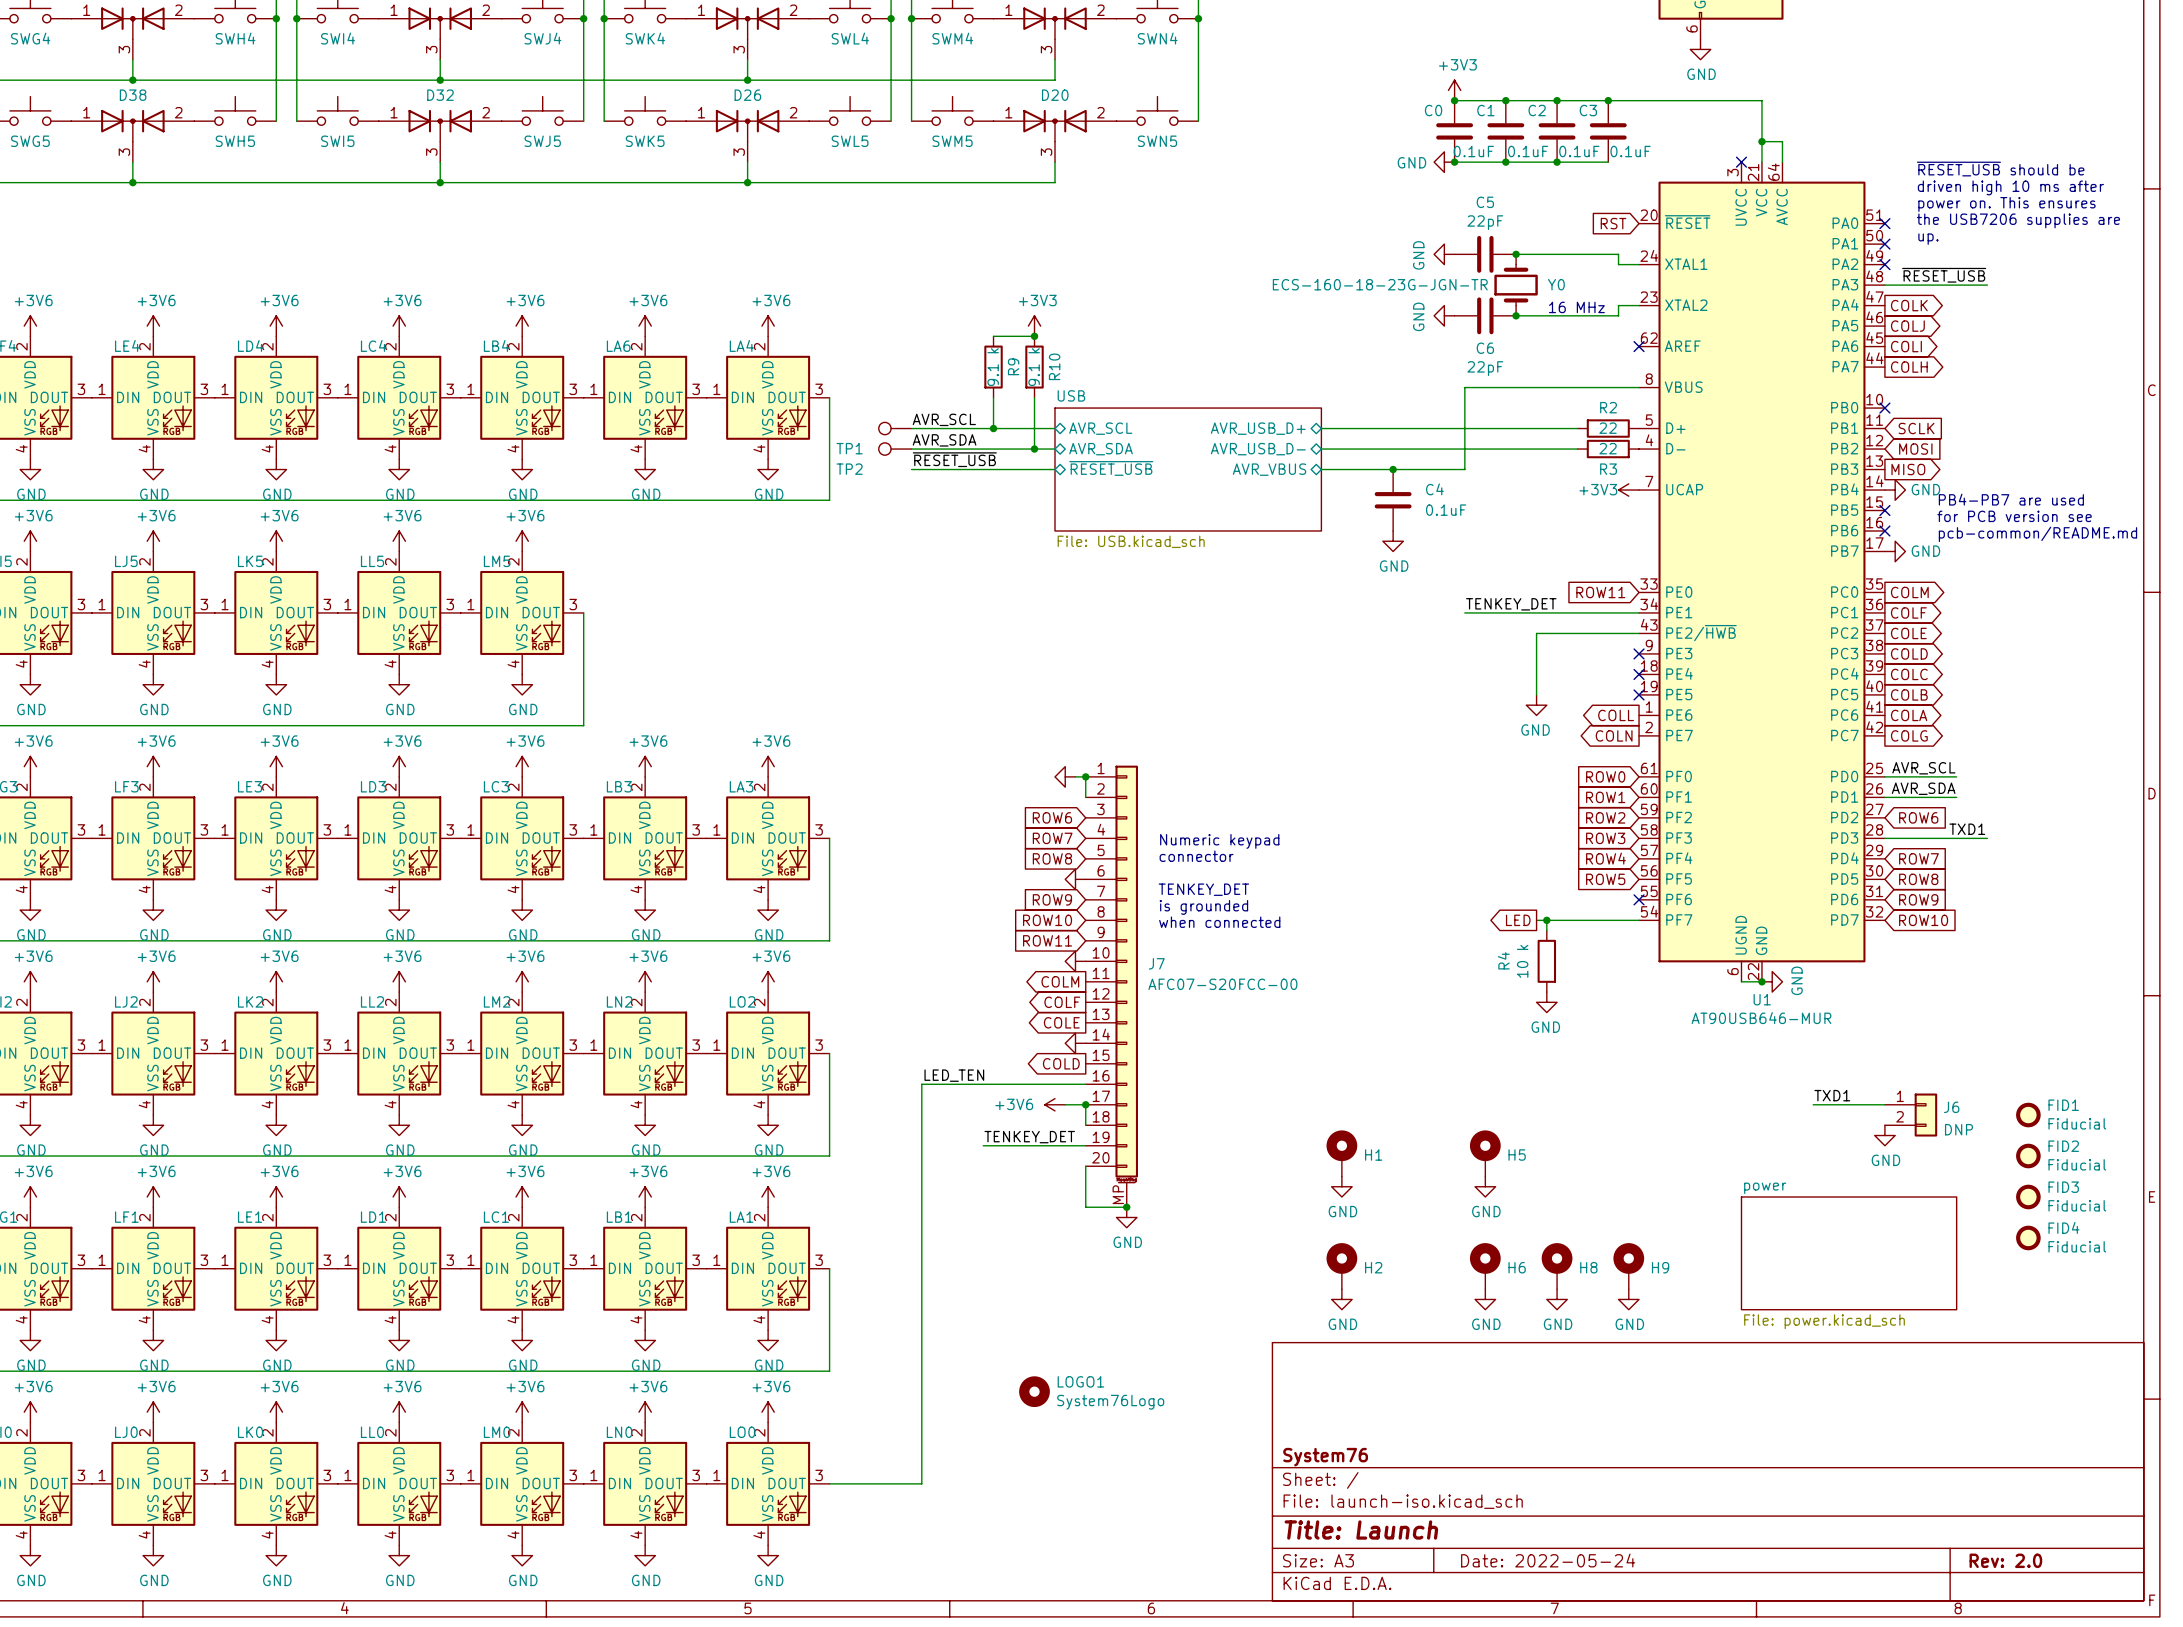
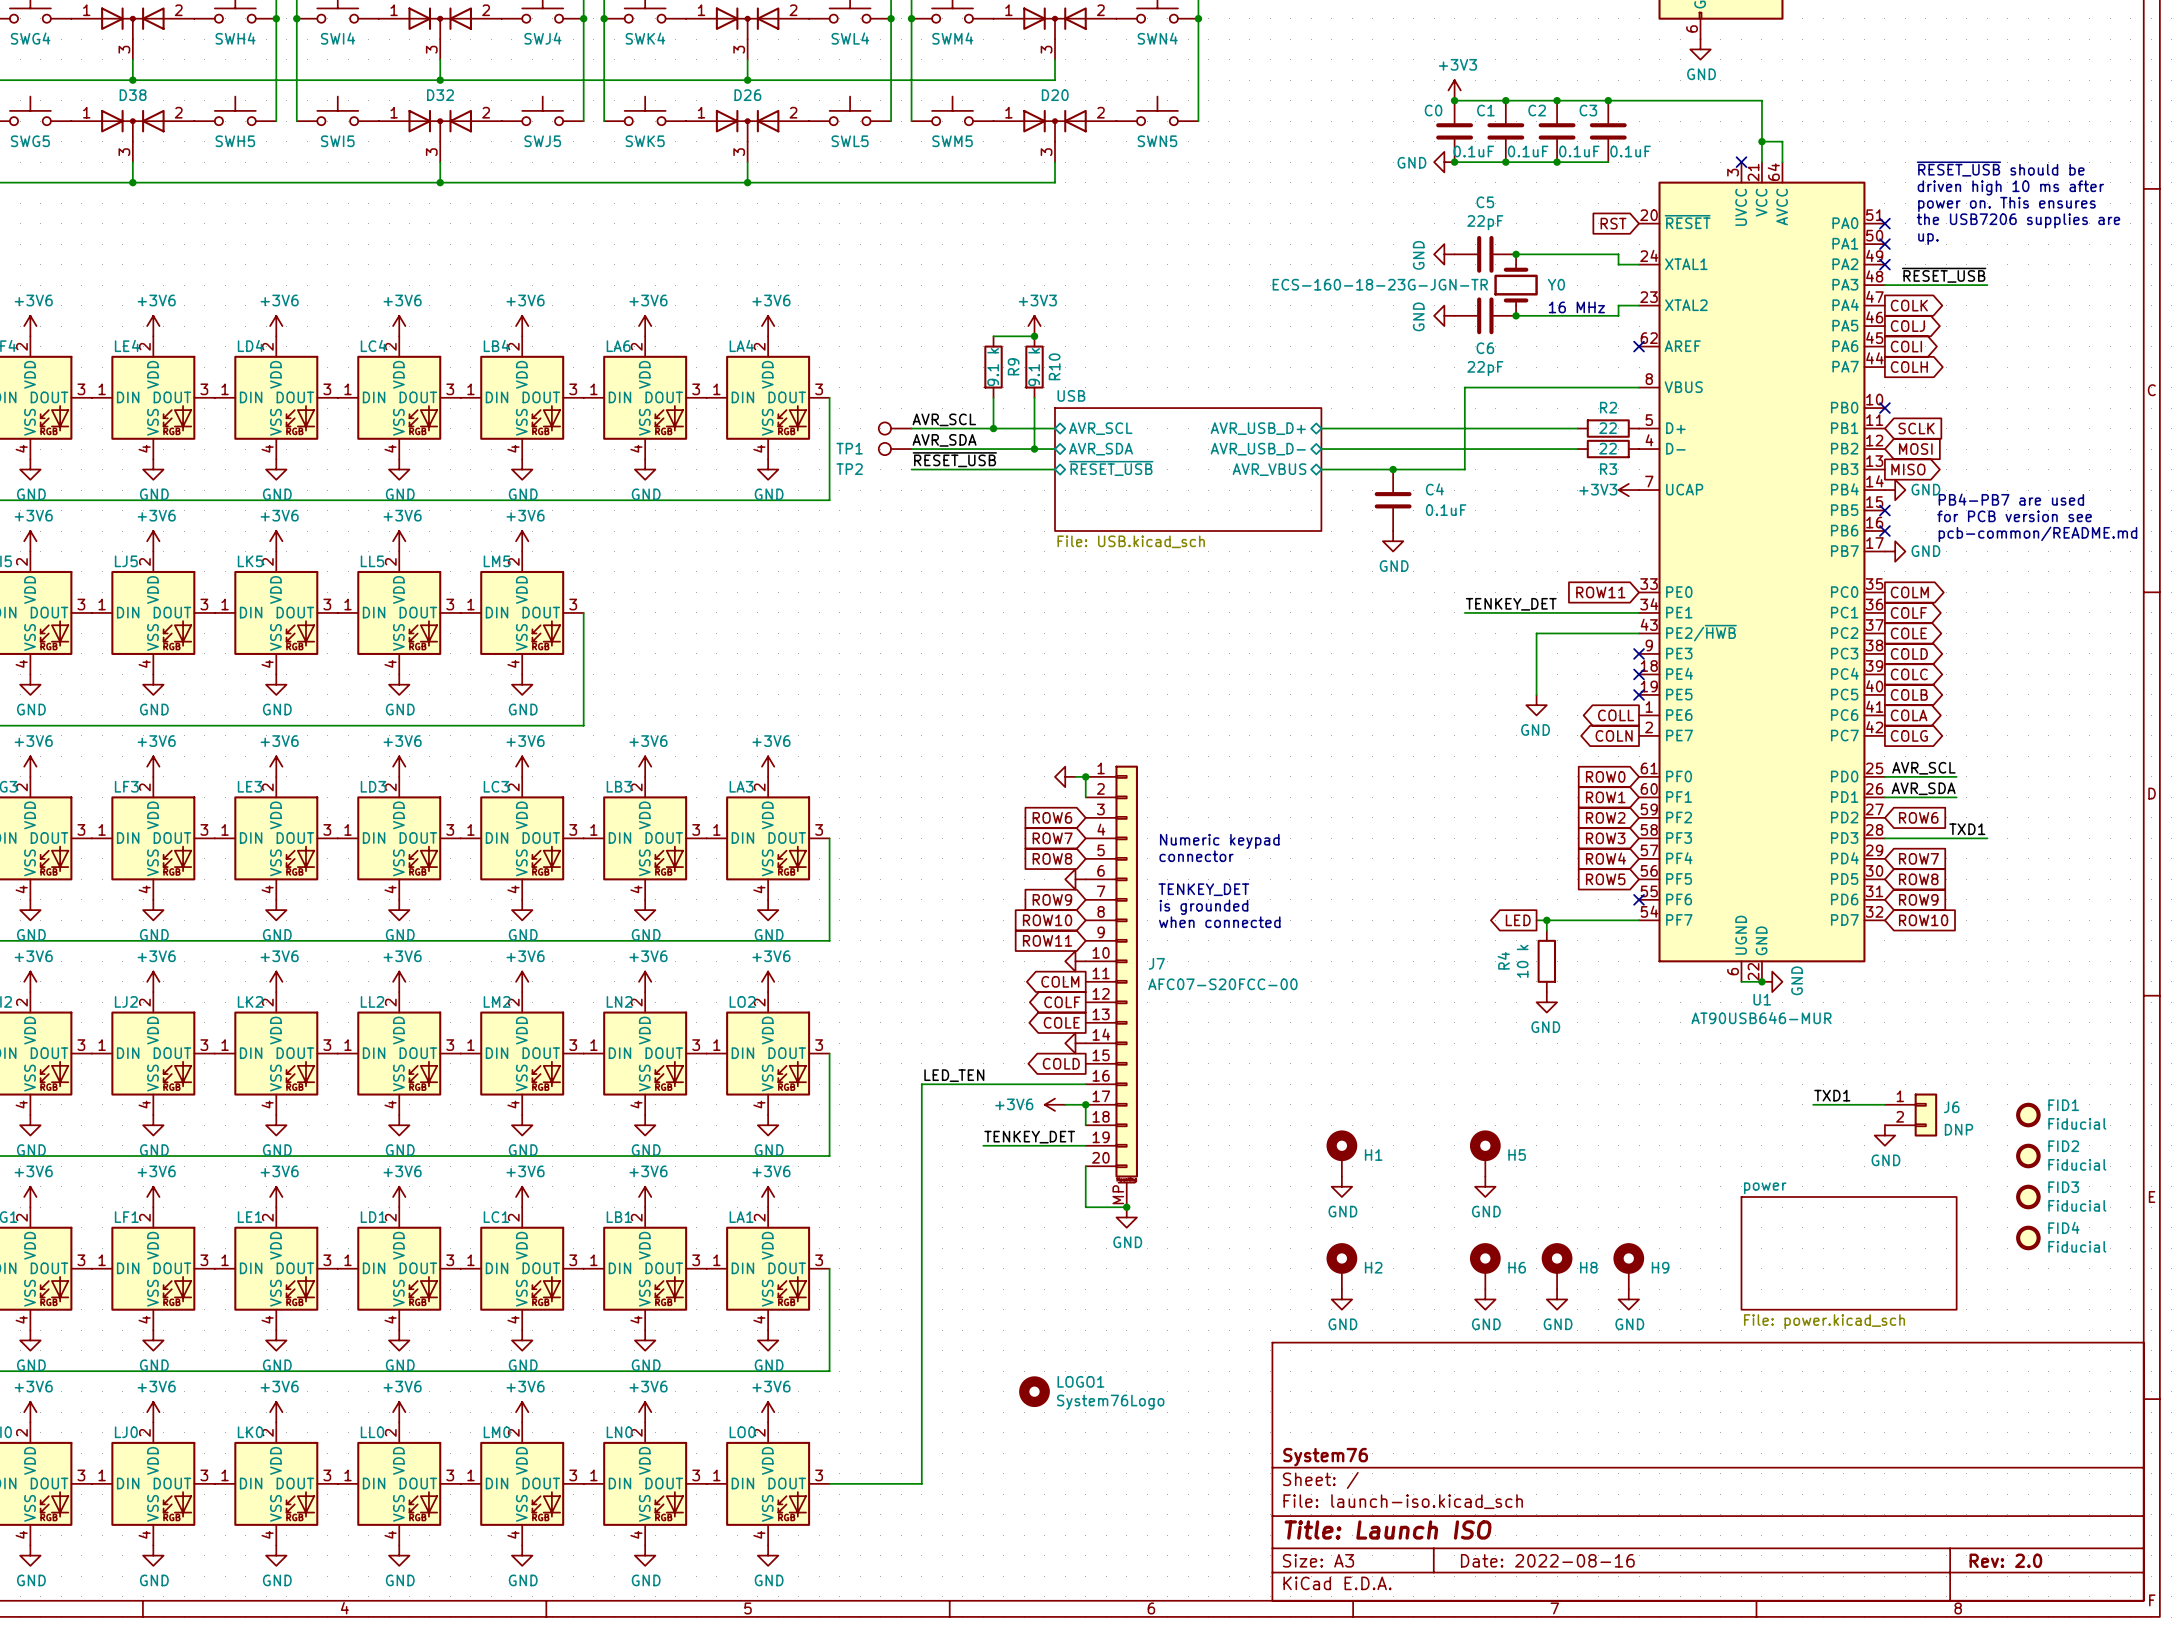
title block: Title: Launch (1361, 1529) -> Title: Launch ISO (1388, 1529)
title block: Date: 2022-05-24 (1548, 1560) -> Date: 2022-08-16 (1547, 1560)

